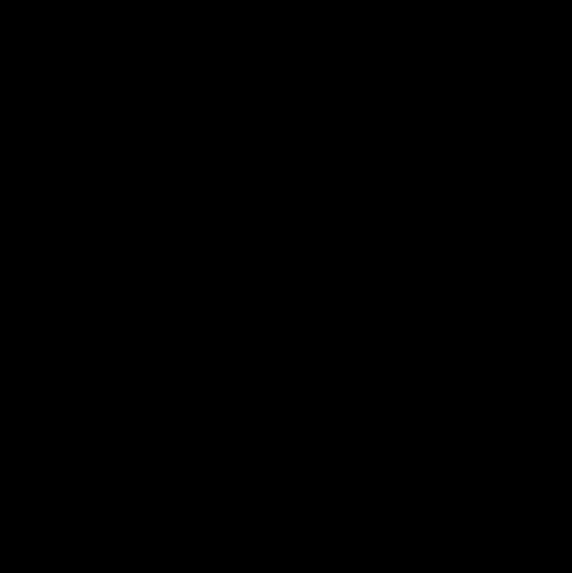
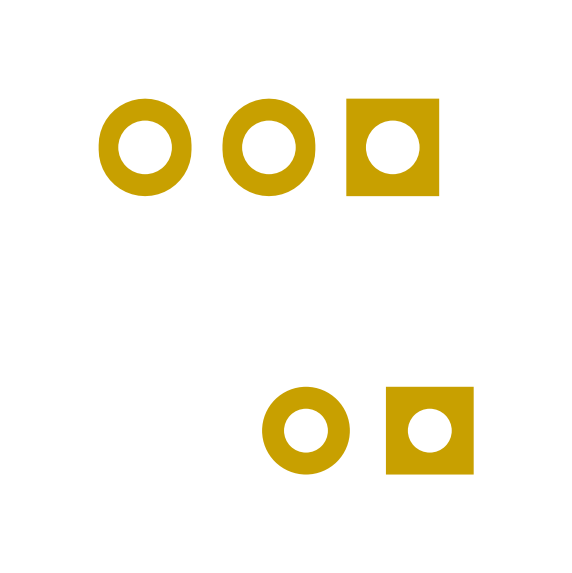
part: none -> (268, 147)
part: none -> (367, 430)

